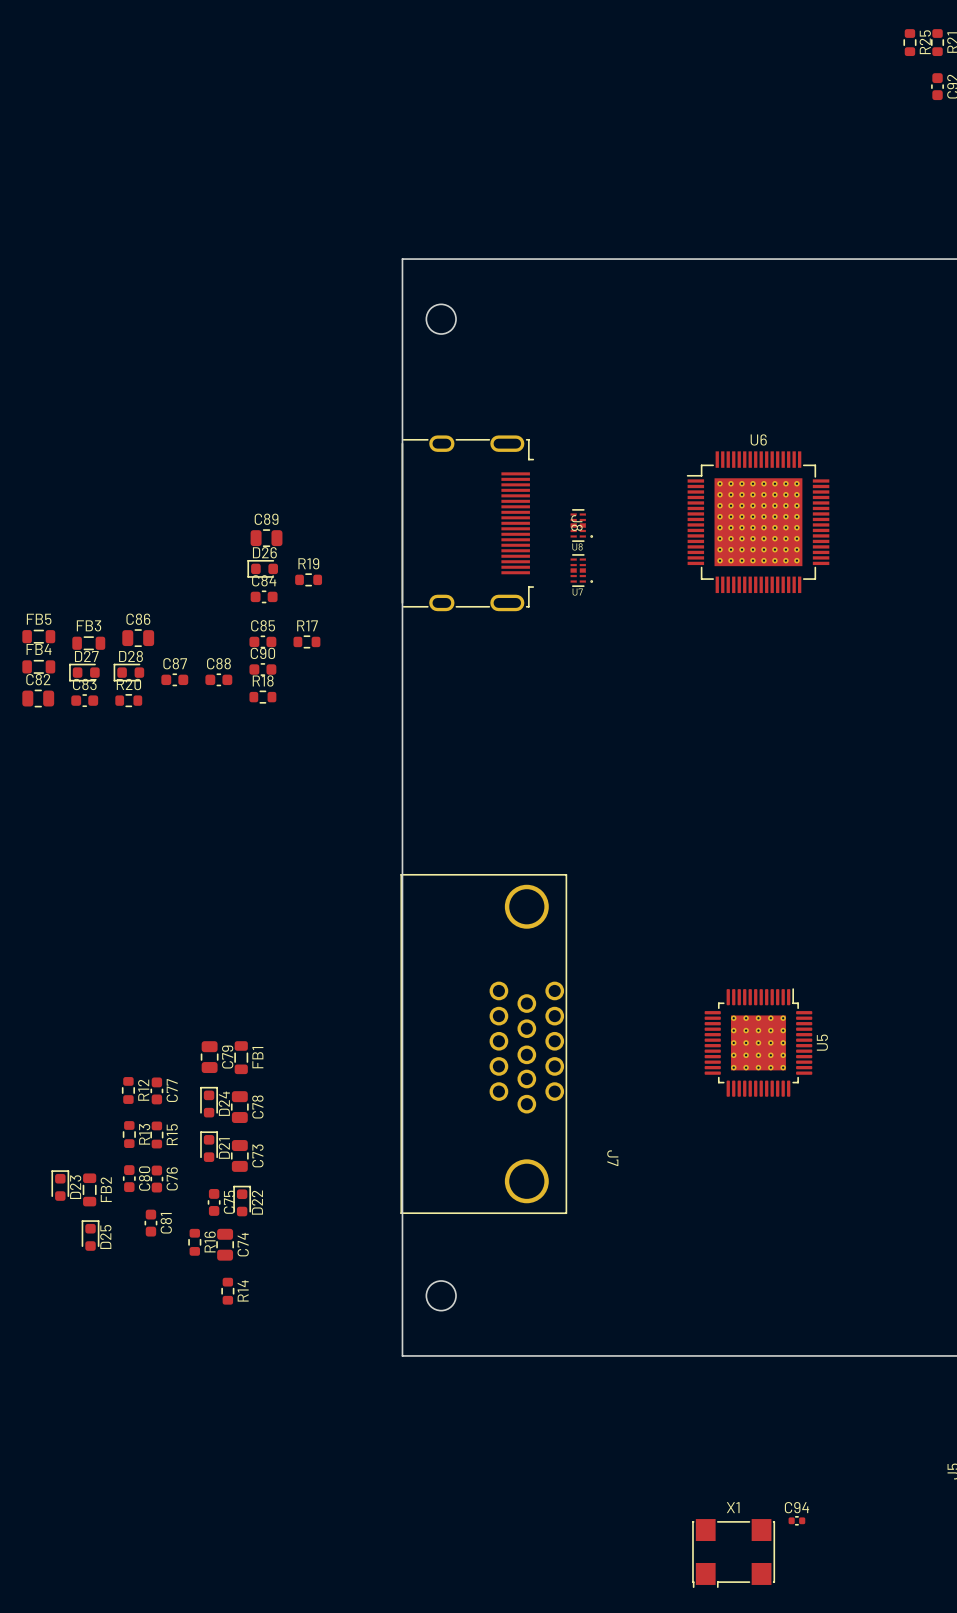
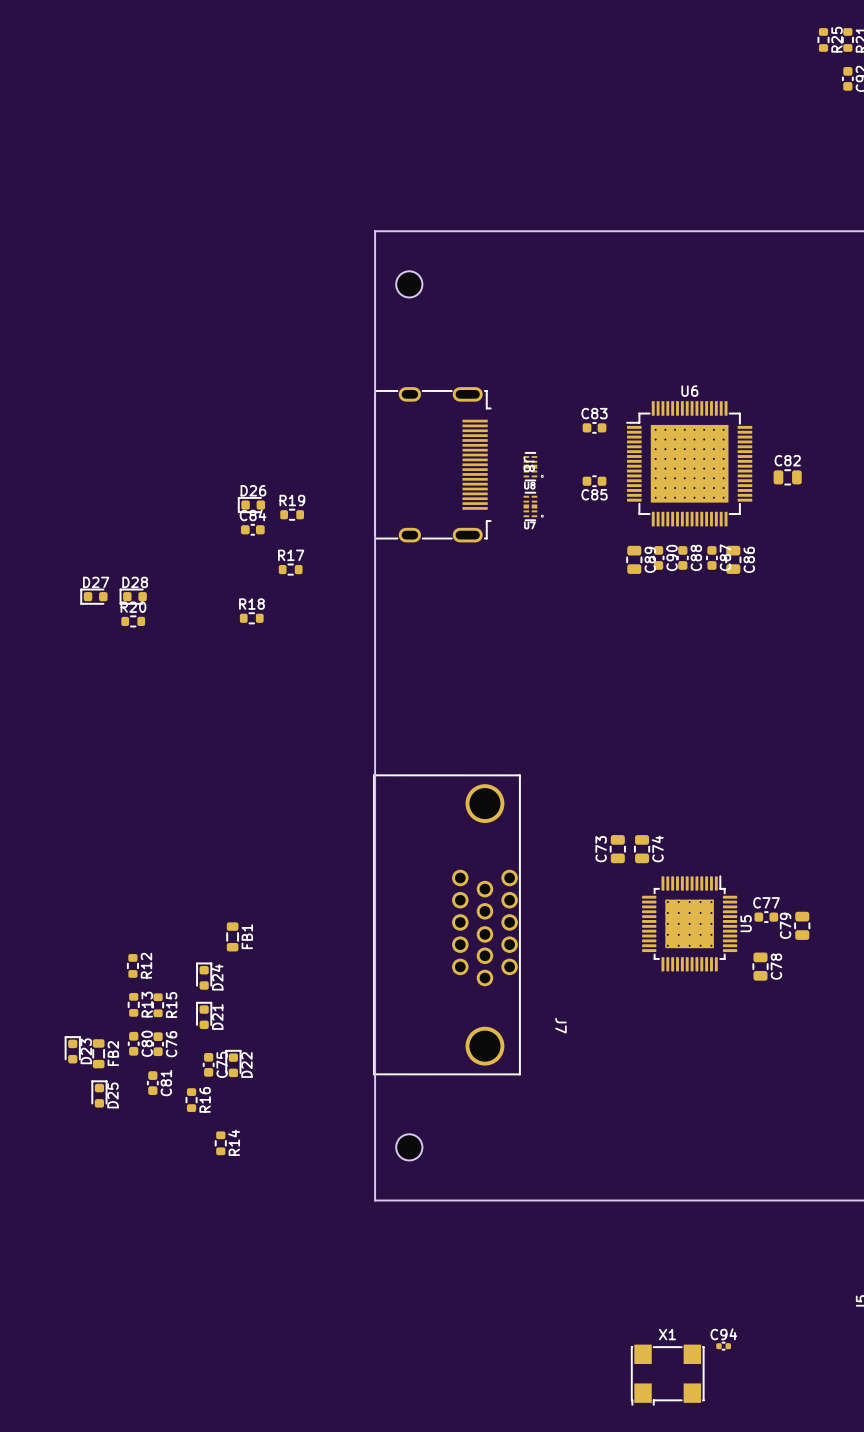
C89 rotation: 0° (266, 538) -> 90° clockwise (634, 559)
C89 position: (266, 538) -> (634, 559)
C85 name position: C85 (263, 625) -> C85 (594, 494)
FB5: (38, 636) -> none
C86 rotation: 0° (138, 638) -> 90° clockwise (733, 559)
C86 position: (138, 638) -> (733, 559)
C85 position: (262, 641) -> (594, 481)
FB3: (88, 643) -> none
FB4: (38, 666) -> none
C90 rotation: 0° (262, 669) -> 90° clockwise (658, 557)
C90 position: (262, 669) -> (658, 557)
C87 rotation: 0° (174, 679) -> 90° clockwise (711, 557)
C87 position: (174, 679) -> (711, 557)
C88 rotation: 0° (218, 679) -> 90° clockwise (682, 557)
C88 position: (218, 679) -> (682, 557)
C82 position: (38, 698) -> (787, 477)
C83 position: (84, 700) -> (594, 427)
C79 position: (209, 1057) -> (802, 925)
C79 name position: C79 (227, 1057) -> C79 (785, 925)
C77 rotation: 0° (156, 1090) -> 90° clockwise (766, 917)
C77 position: (156, 1090) -> (766, 917)
C77 name position: C77 (172, 1090) -> C77 (766, 902)
C78 position: (239, 1107) -> (760, 966)
C73 position: (239, 1155) -> (617, 849)
C73 name position: C73 (257, 1155) -> C73 (601, 849)
C74 position: (225, 1244) -> (642, 849)

